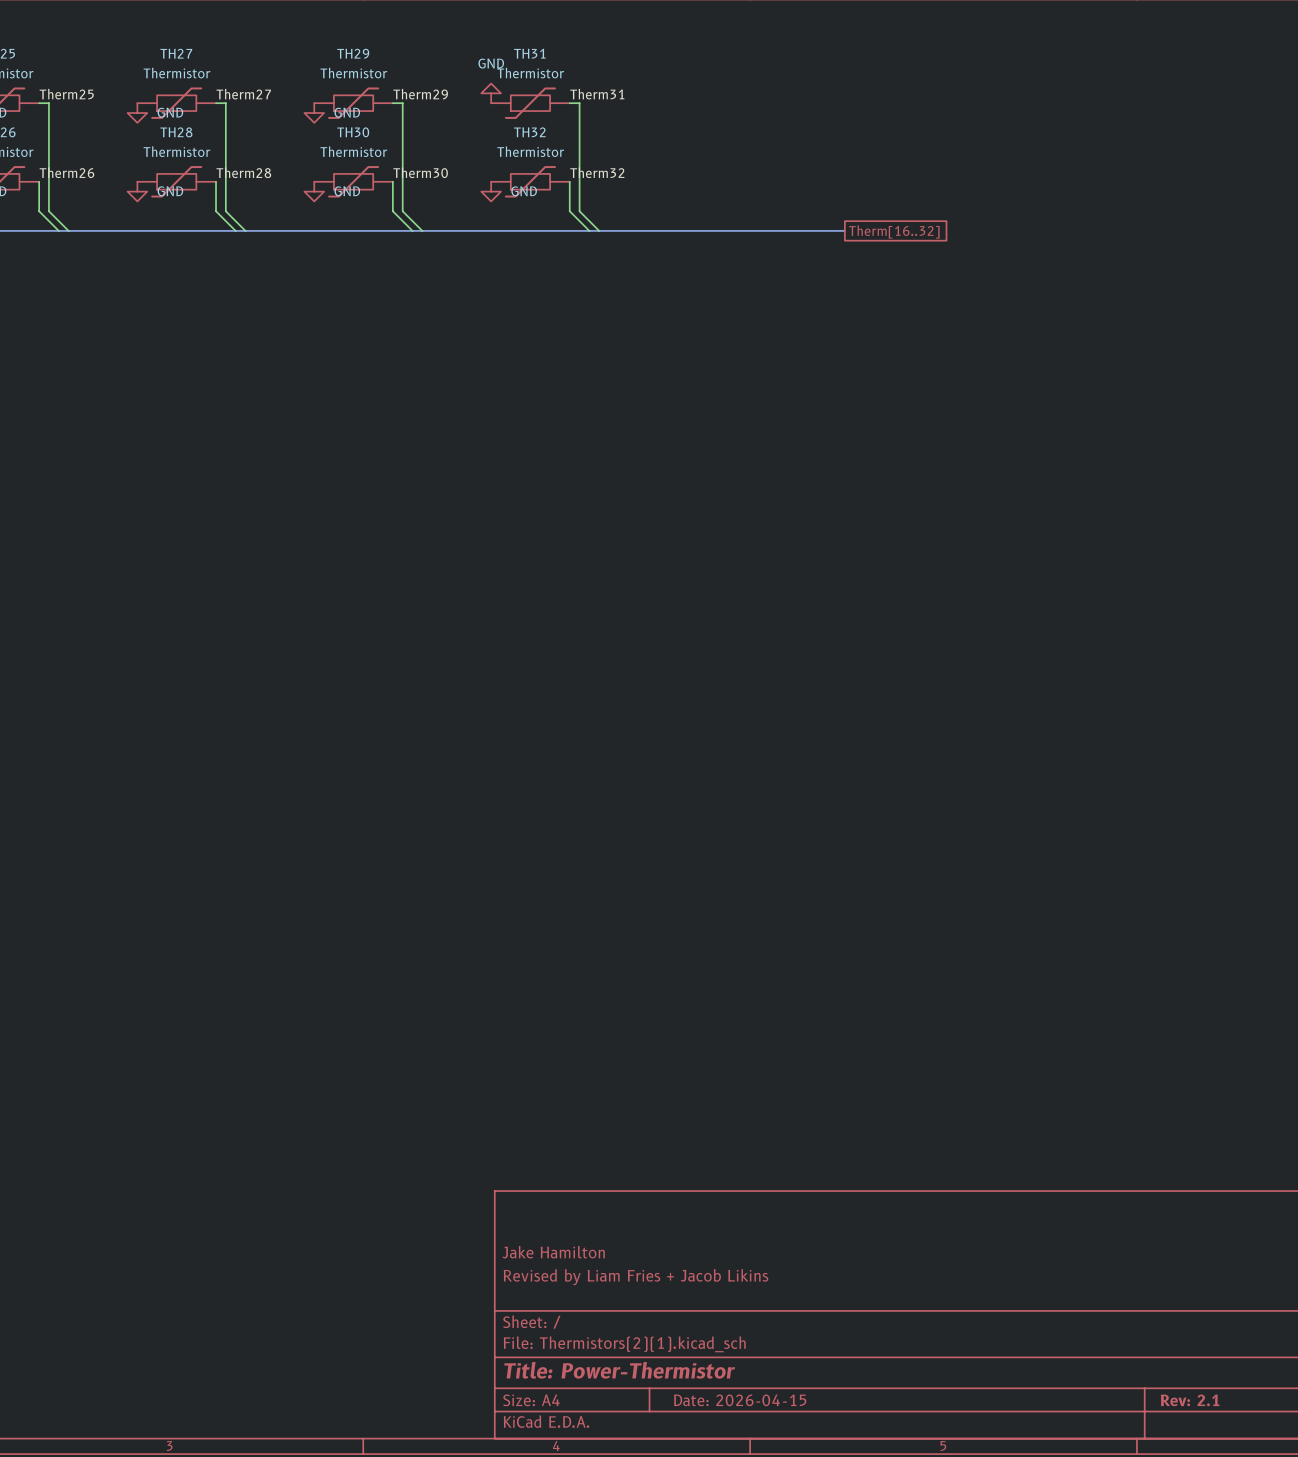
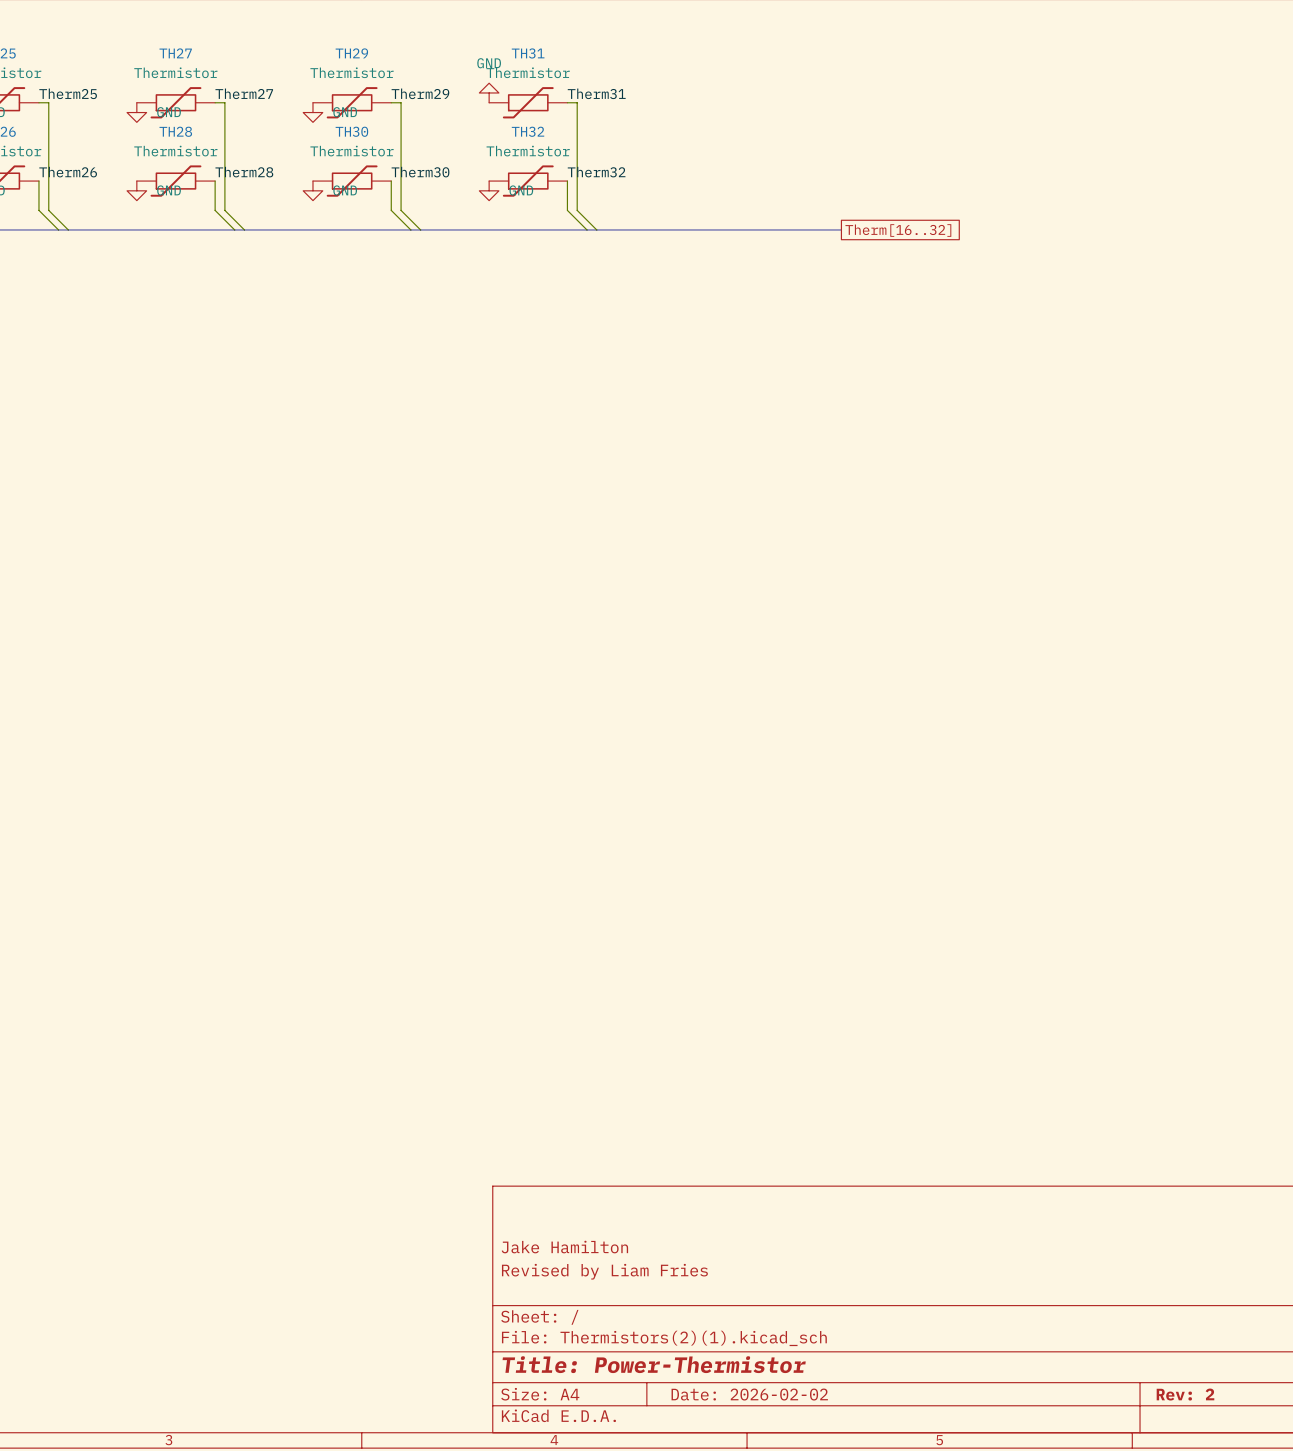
title block: Revised by Liam Fries + Jacob Likins (635, 1277) -> Revised by Liam Fries (604, 1271)
title block: Date: 2026-04-15 (740, 1400) -> Date: 2026-02-02 (749, 1394)
title block: Rev: 2.1 (1190, 1400) -> Rev: 2 (1185, 1394)

